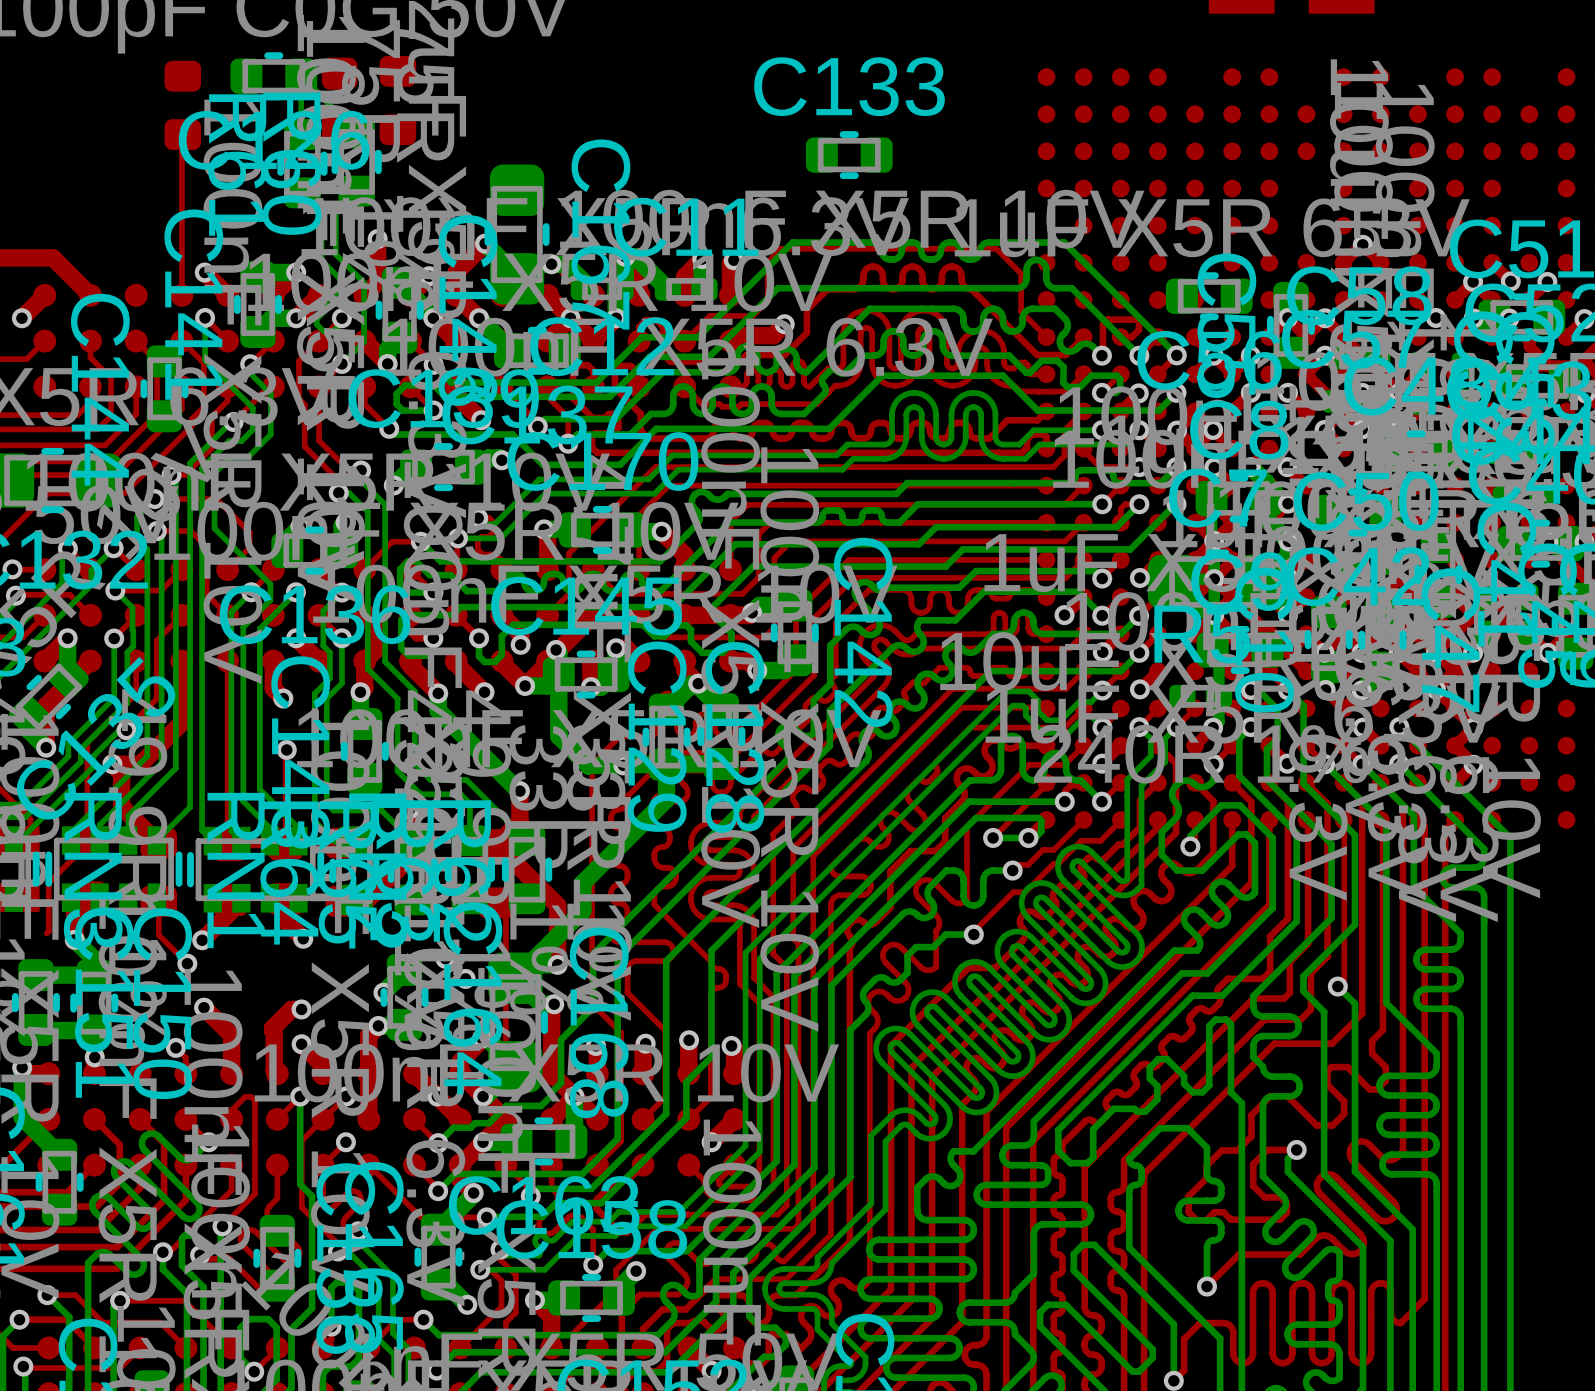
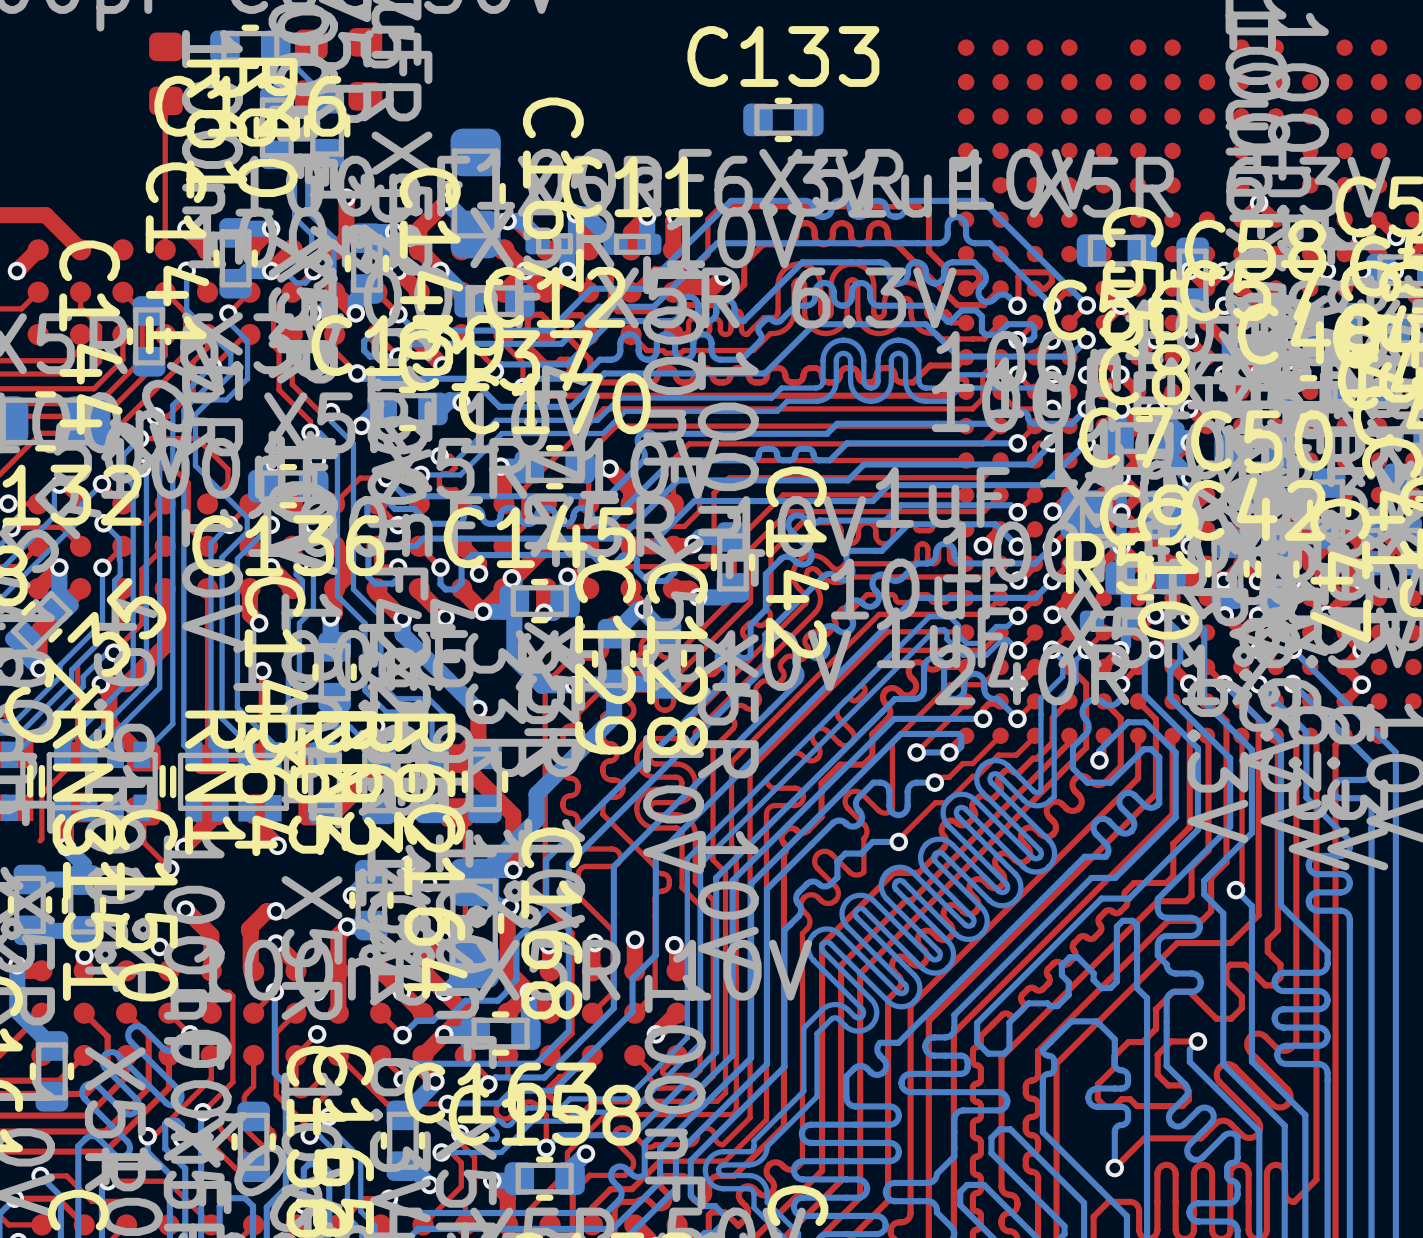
top track: (1006, 258) (1021, 273) (1021, 311) -> (928, 216) (928, 251) (942, 265)
top track: (1029, 319) (1046, 337) -> (949, 272) (975, 272) (979, 276) (979, 280) (971, 288) (966, 288)

